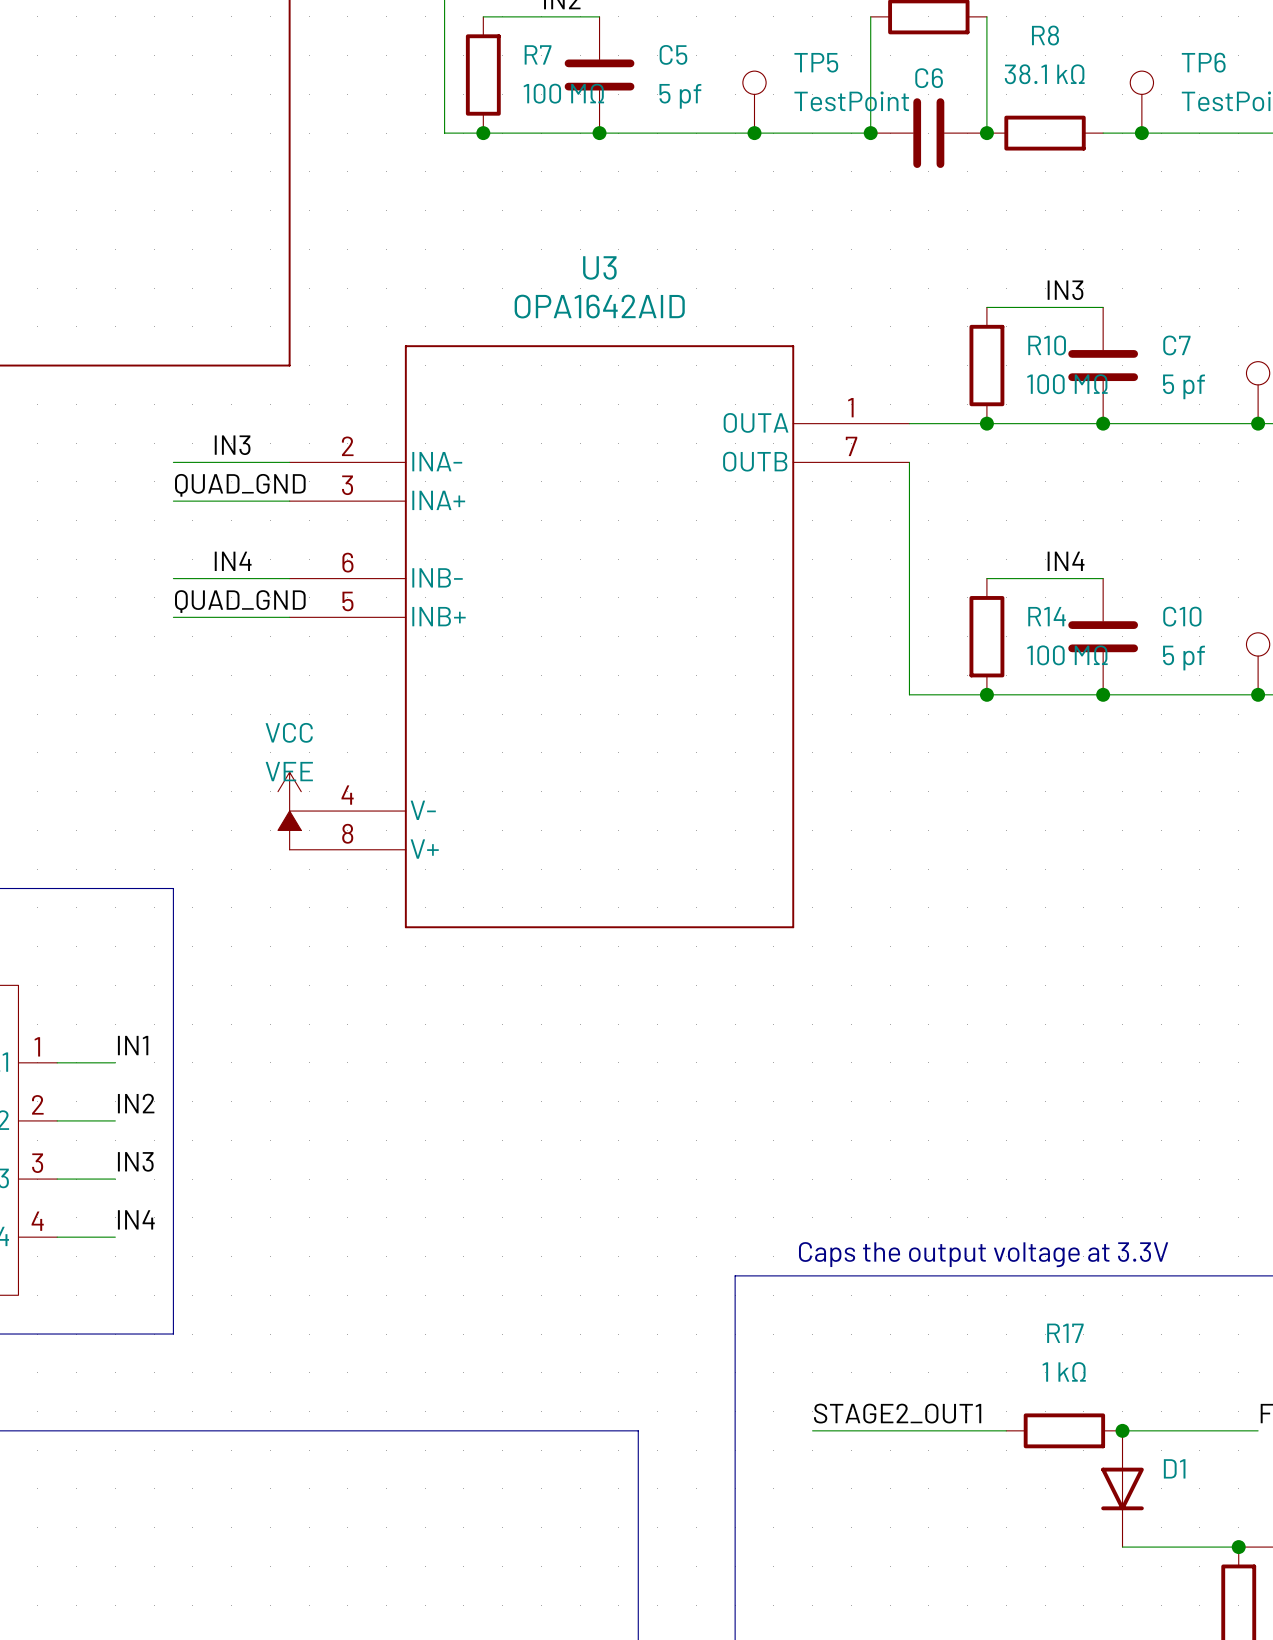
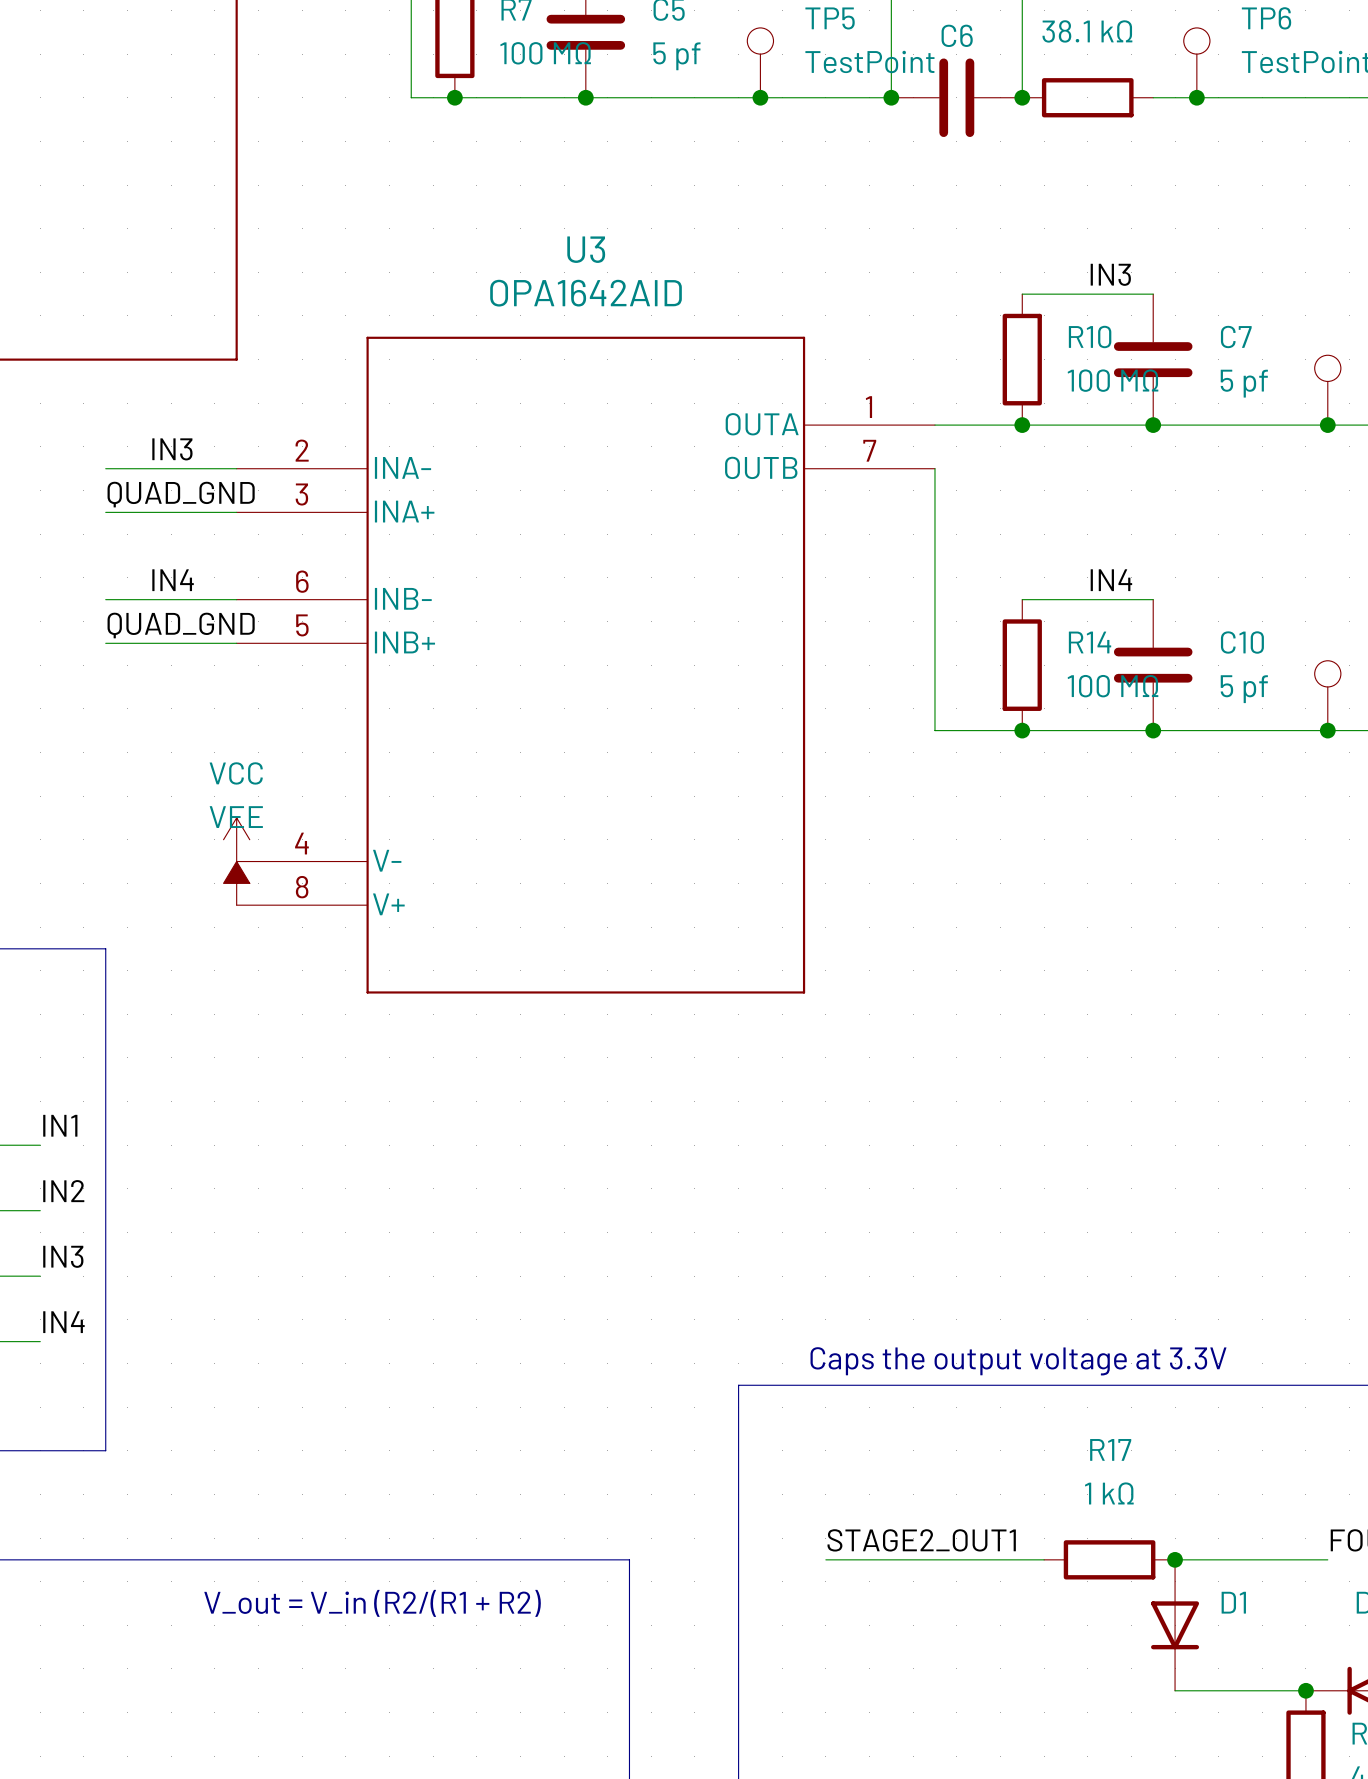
text: none -> V_out = V_in (R2/(R1 + R2) (372, 1603)

